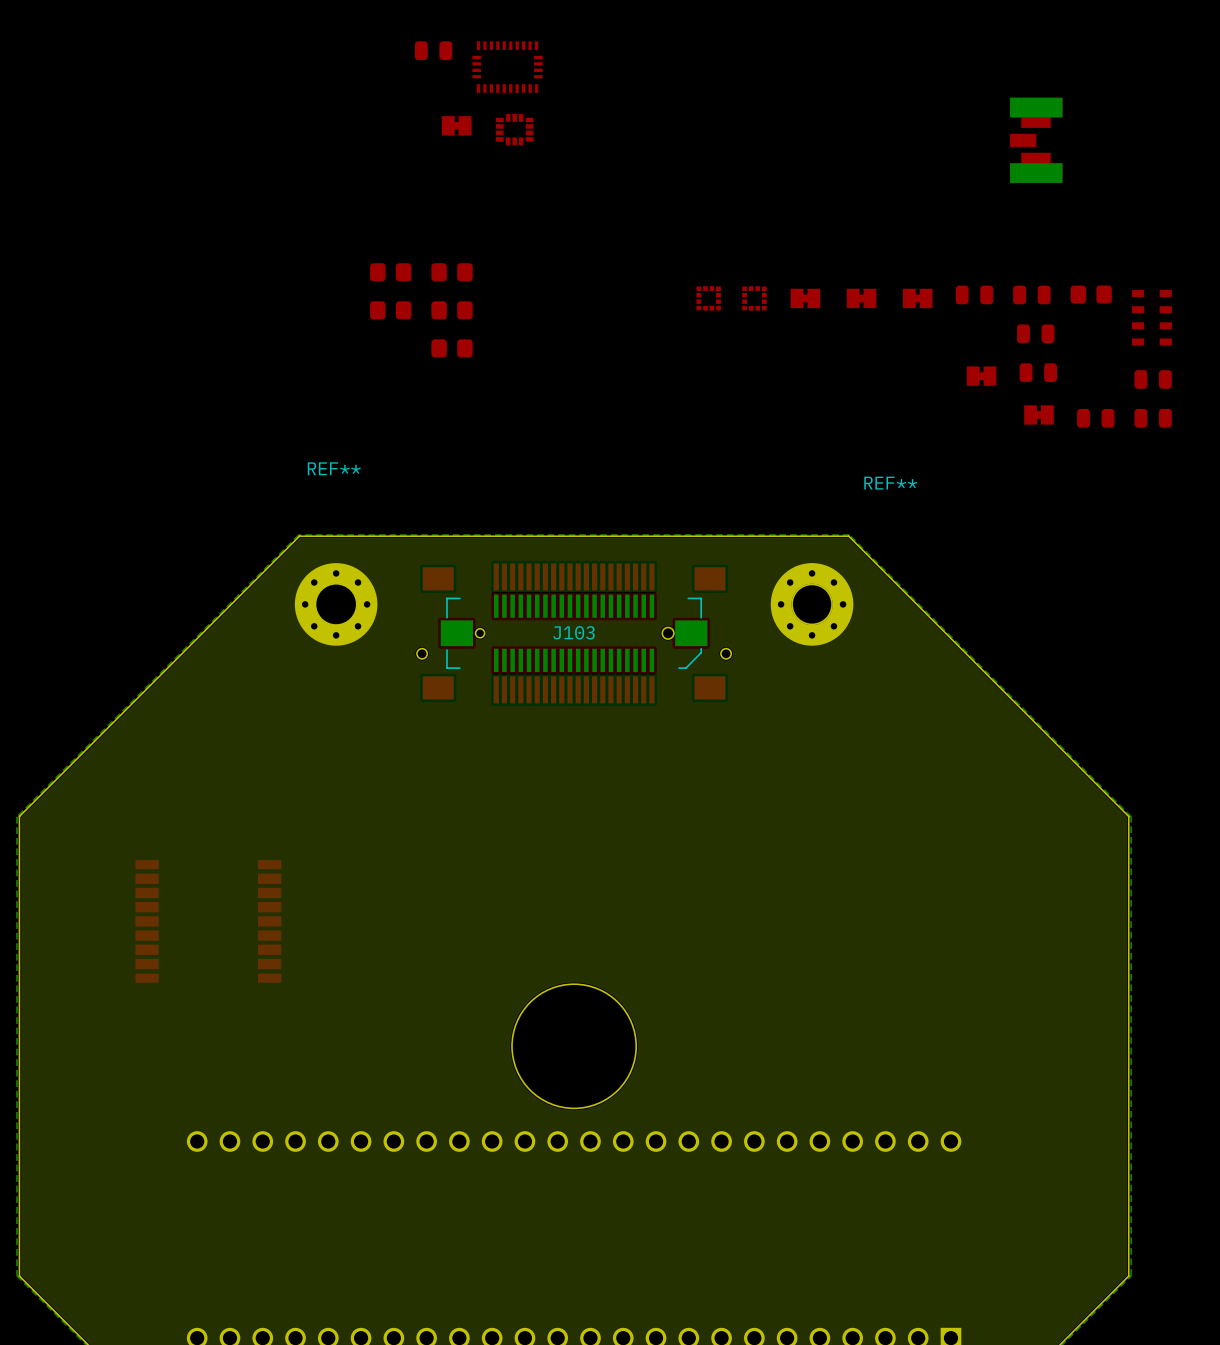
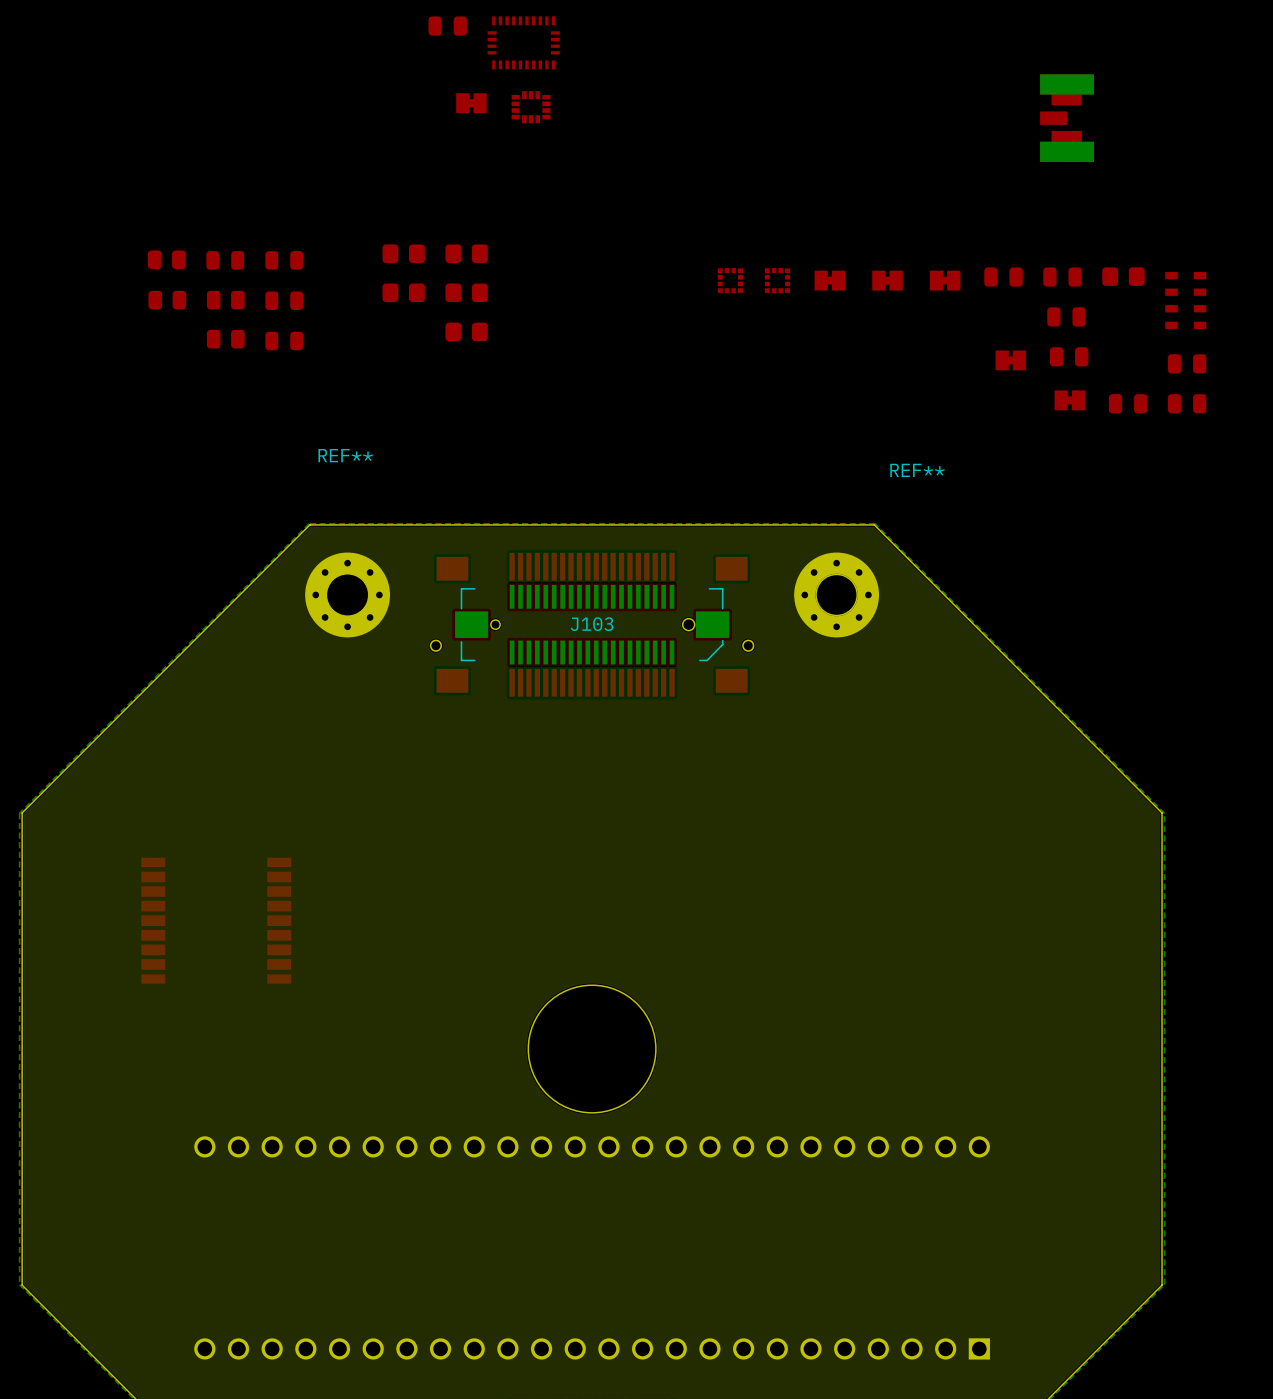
part: none -> (166, 259)
part: none -> (225, 260)
part: none -> (284, 260)
part: none -> (167, 300)
part: none -> (225, 300)
part: none -> (284, 300)
part: none -> (225, 339)
part: none -> (284, 340)

